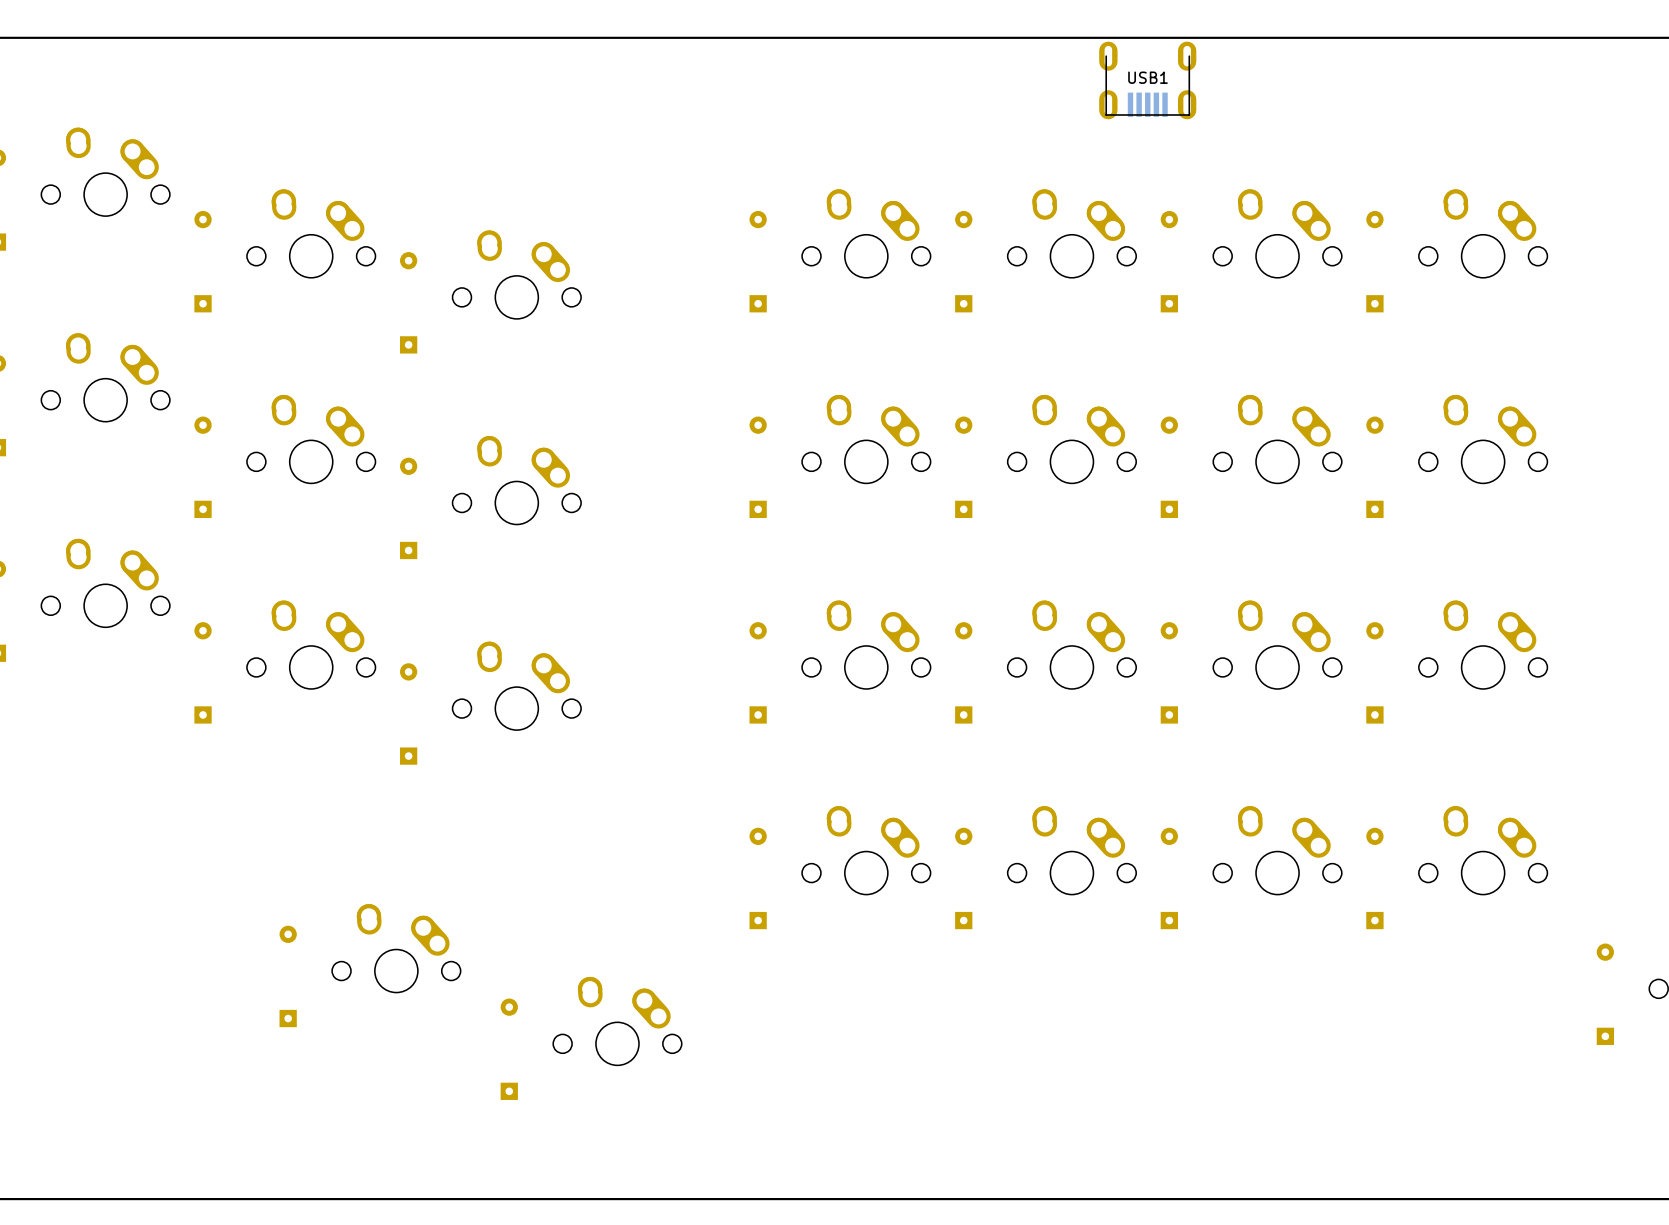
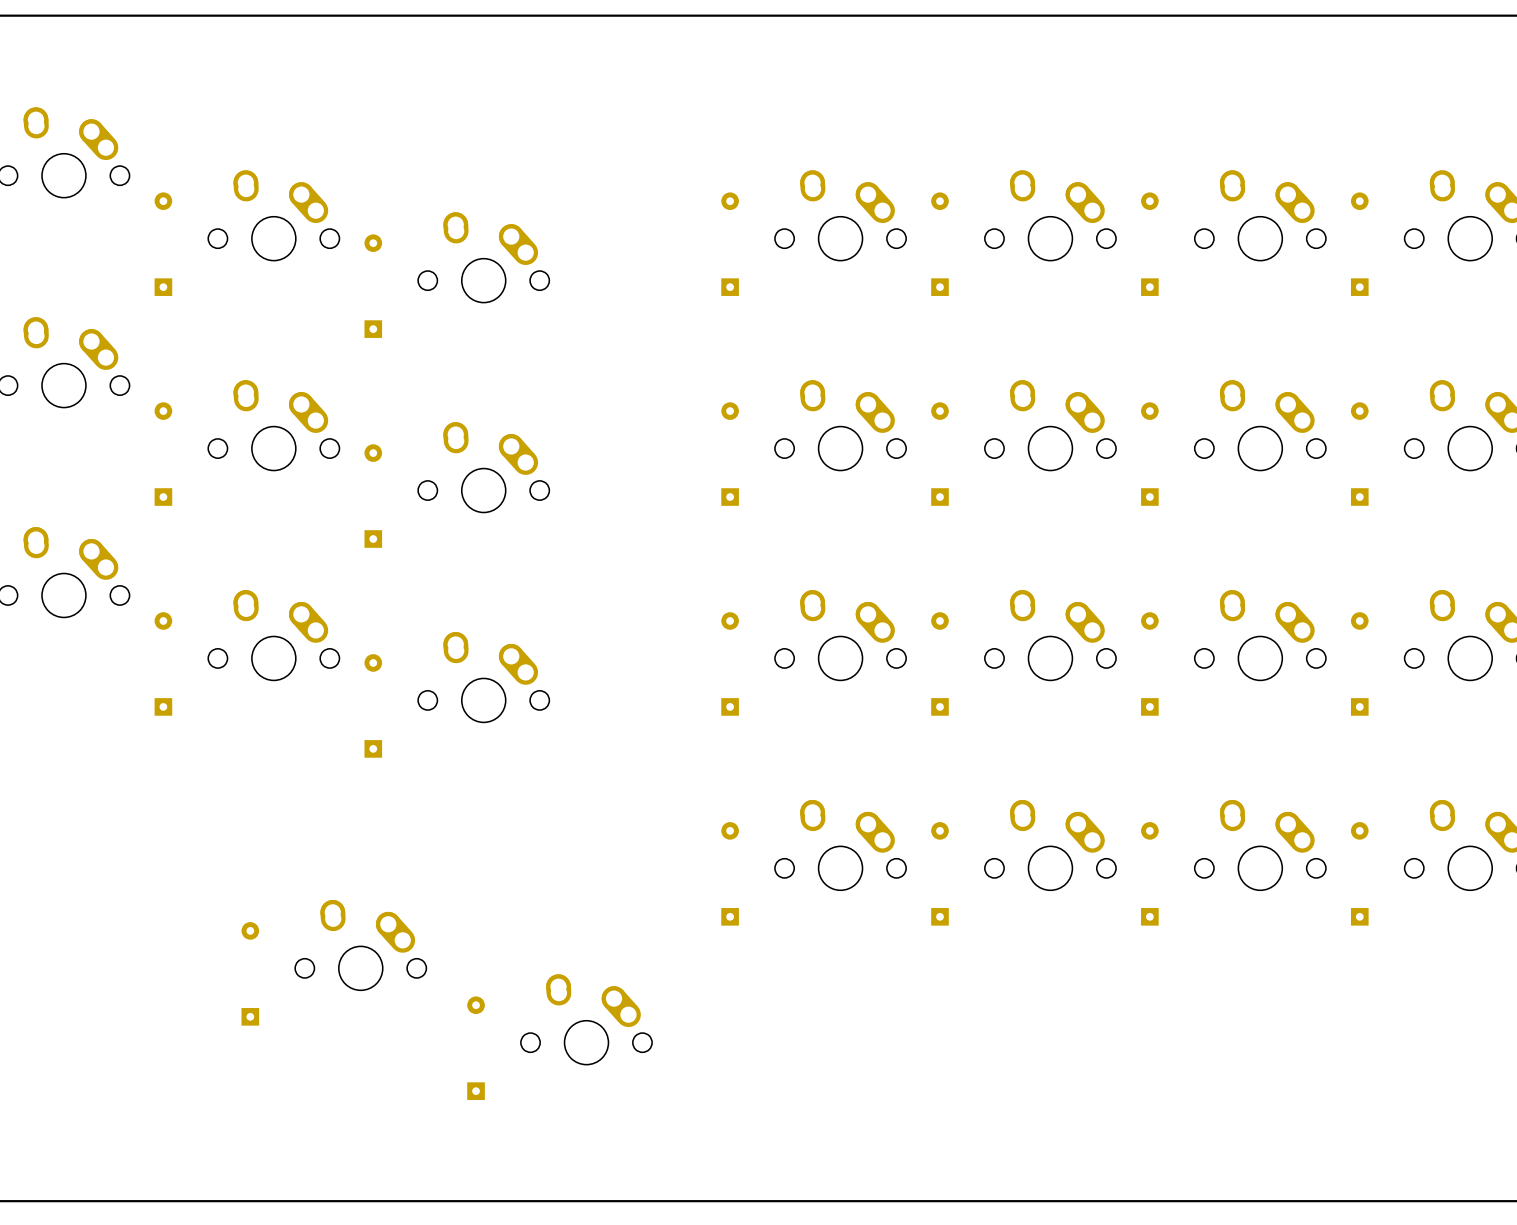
USB1: (1147, 80) -> none

